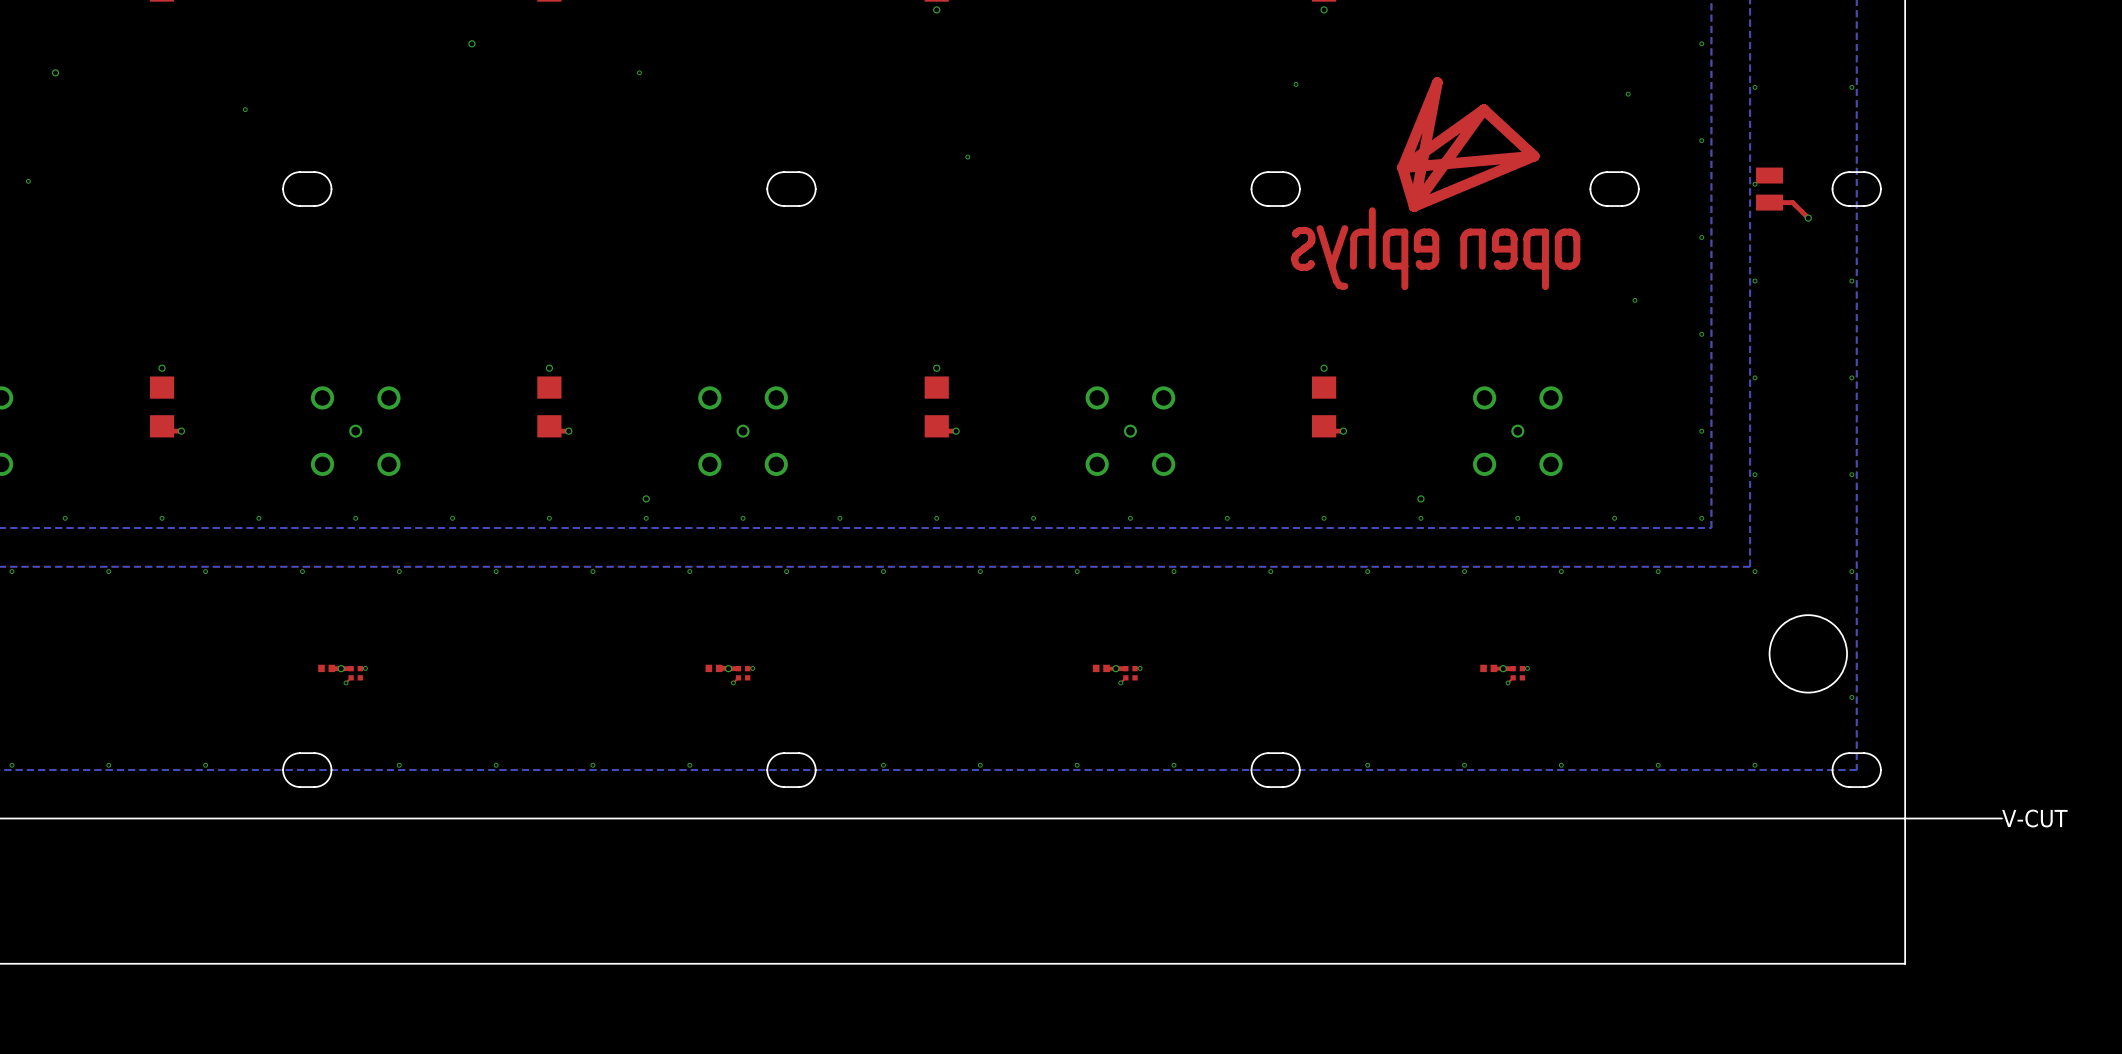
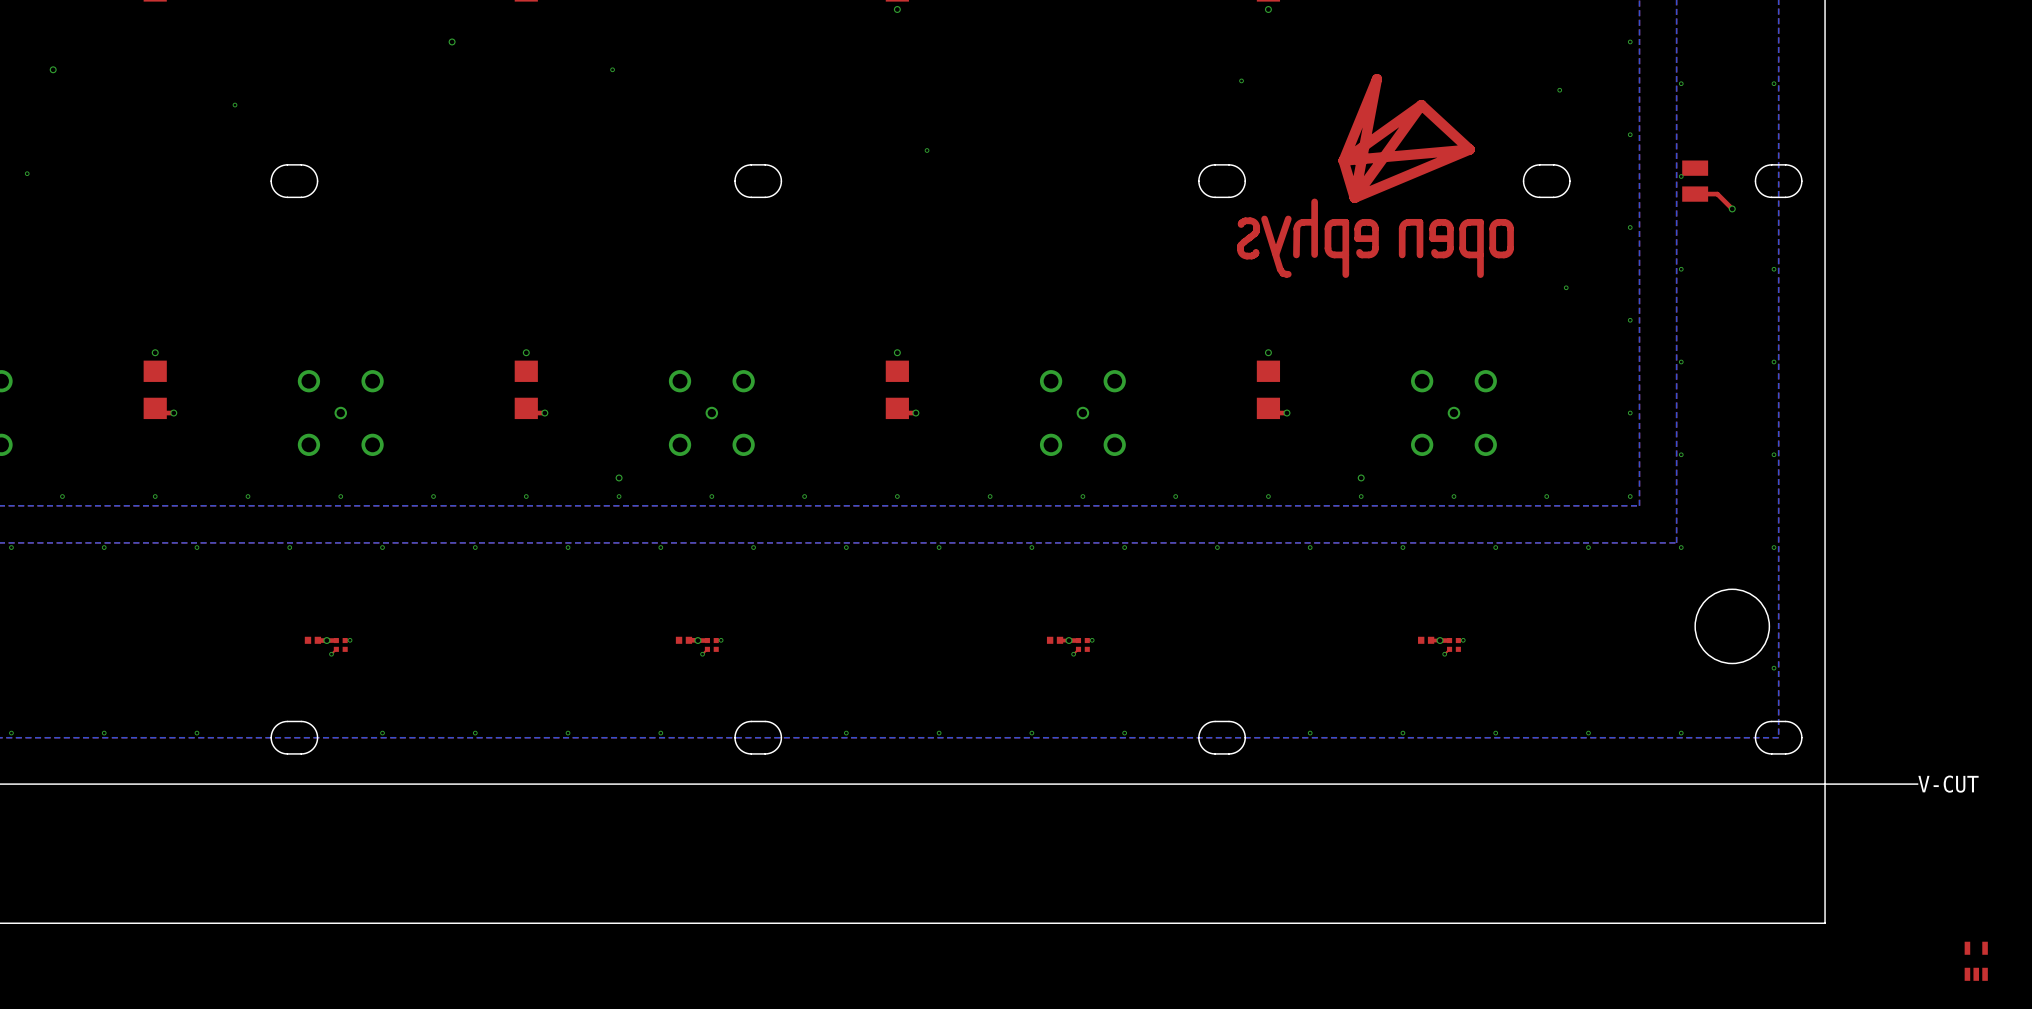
part: none -> (1976, 961)

